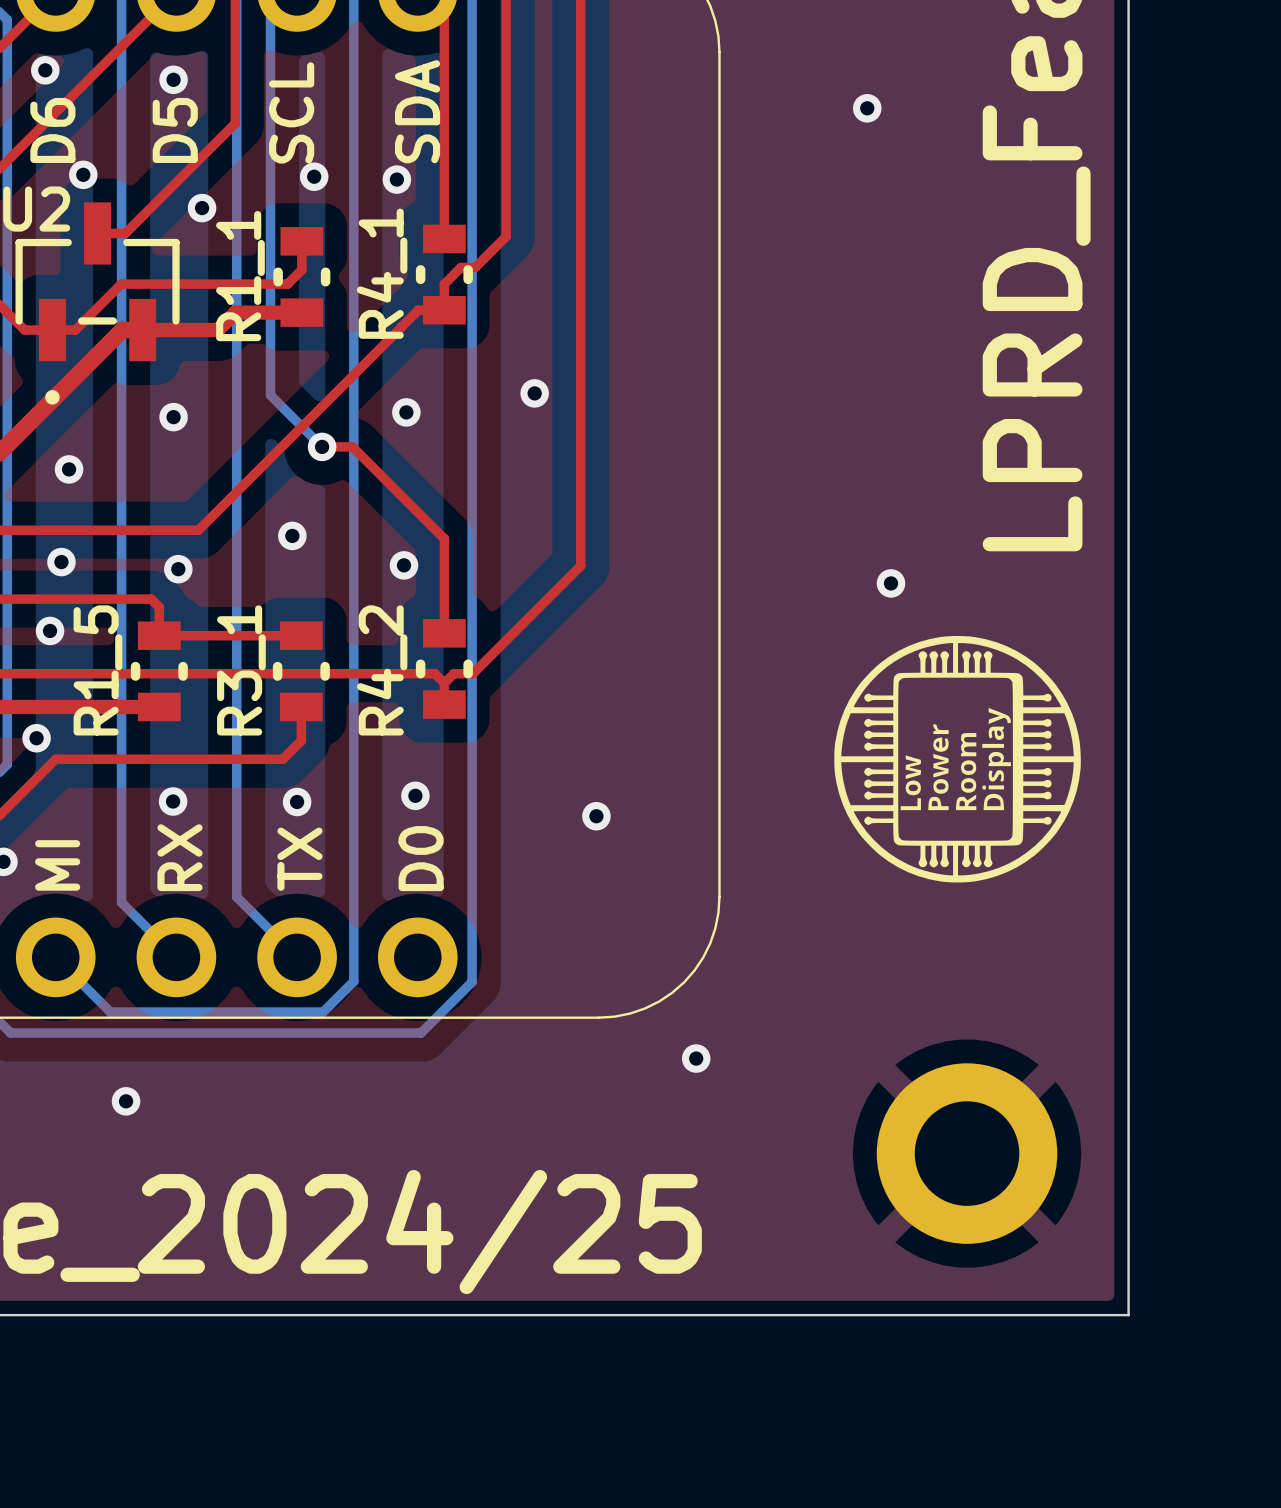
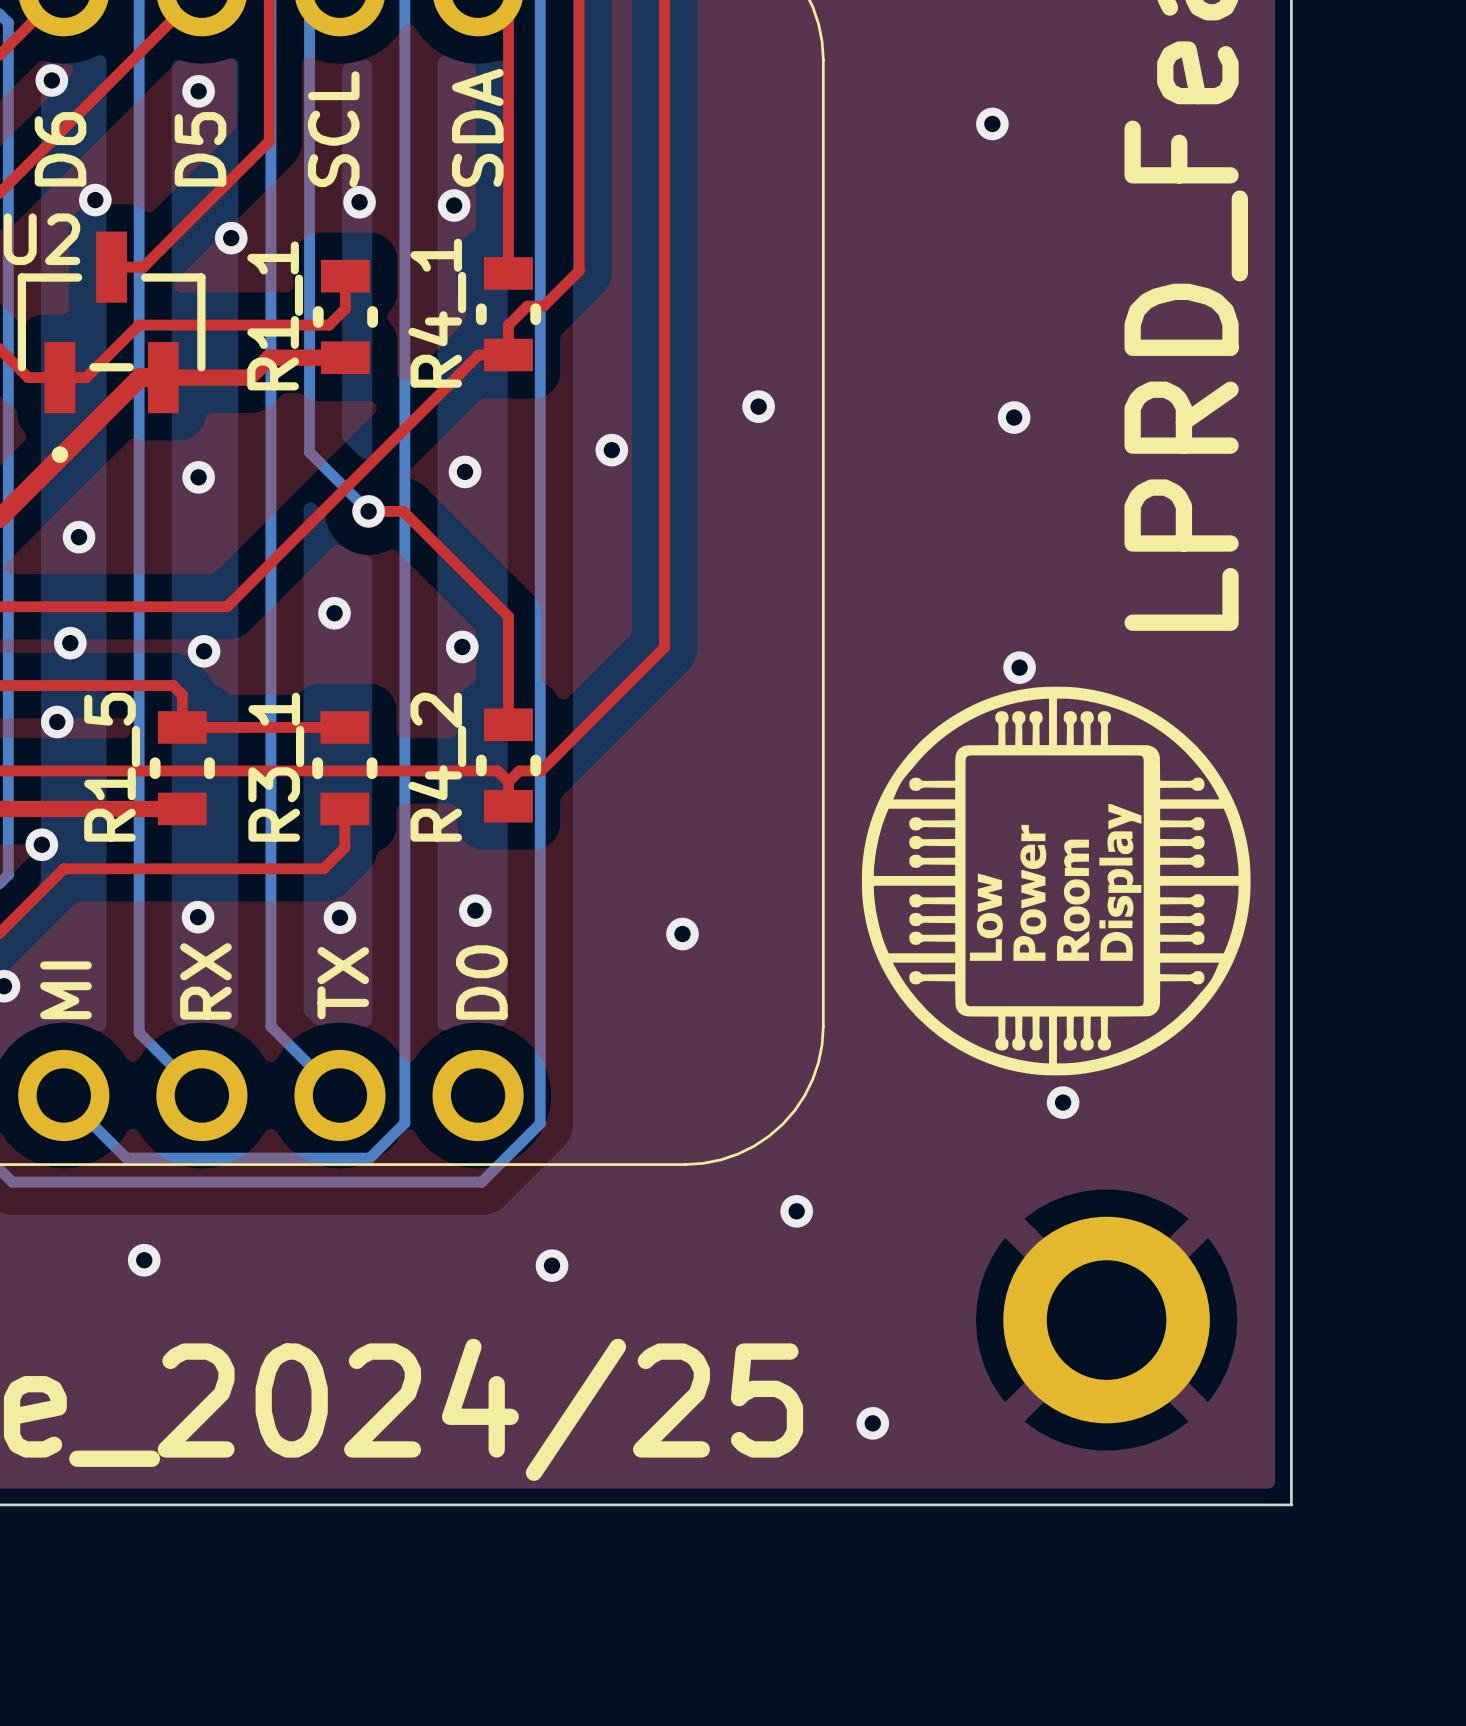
via: none -> (758, 406)
via: none -> (1014, 417)
drawing: none -> [861, 686, 1251, 1076]
drawing: [834, 635, 1081, 883] -> none
via: none -> (1063, 1102)
via: none -> (552, 1265)
via: none -> (872, 1423)

